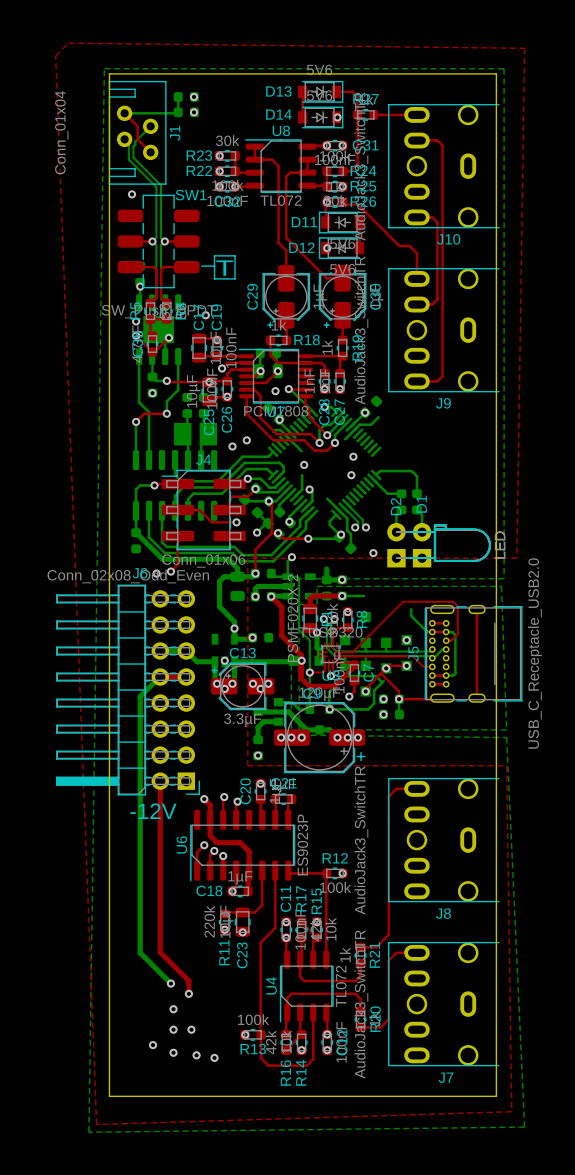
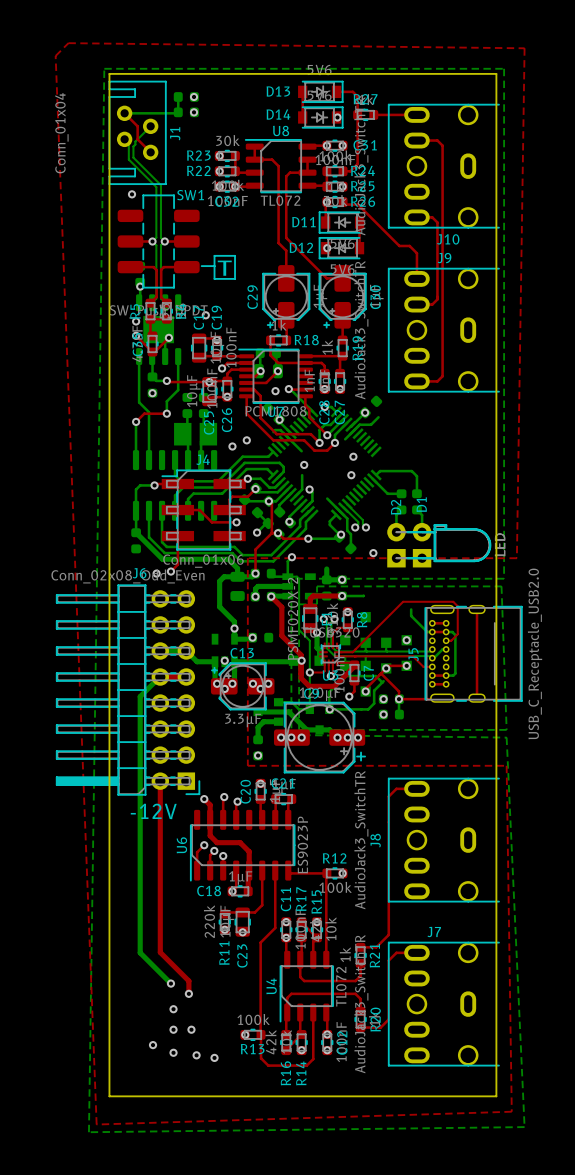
J9 name position: J9 (443, 403) -> J9 (444, 258)
J8 name rotation: 0° (443, 913) -> 90° counterclockwise (375, 840)
J8 name position: J8 (443, 913) -> J8 (375, 840)
J7 name position: J7 (446, 1077) -> J7 (434, 932)

